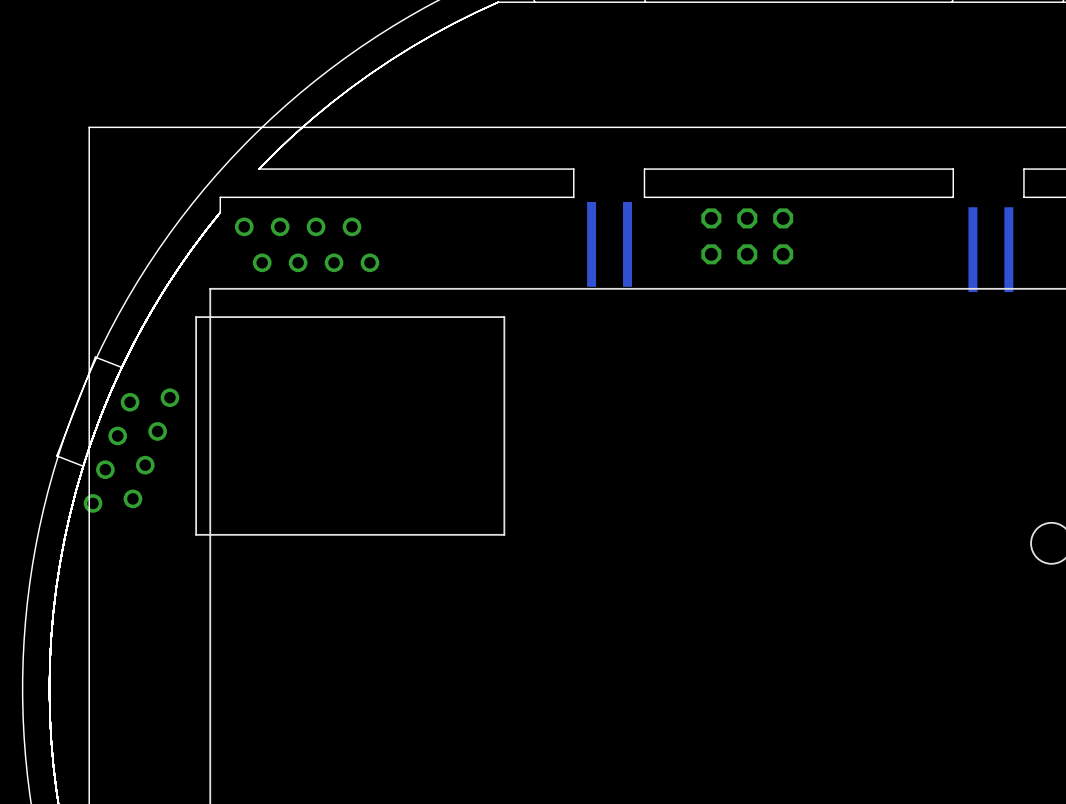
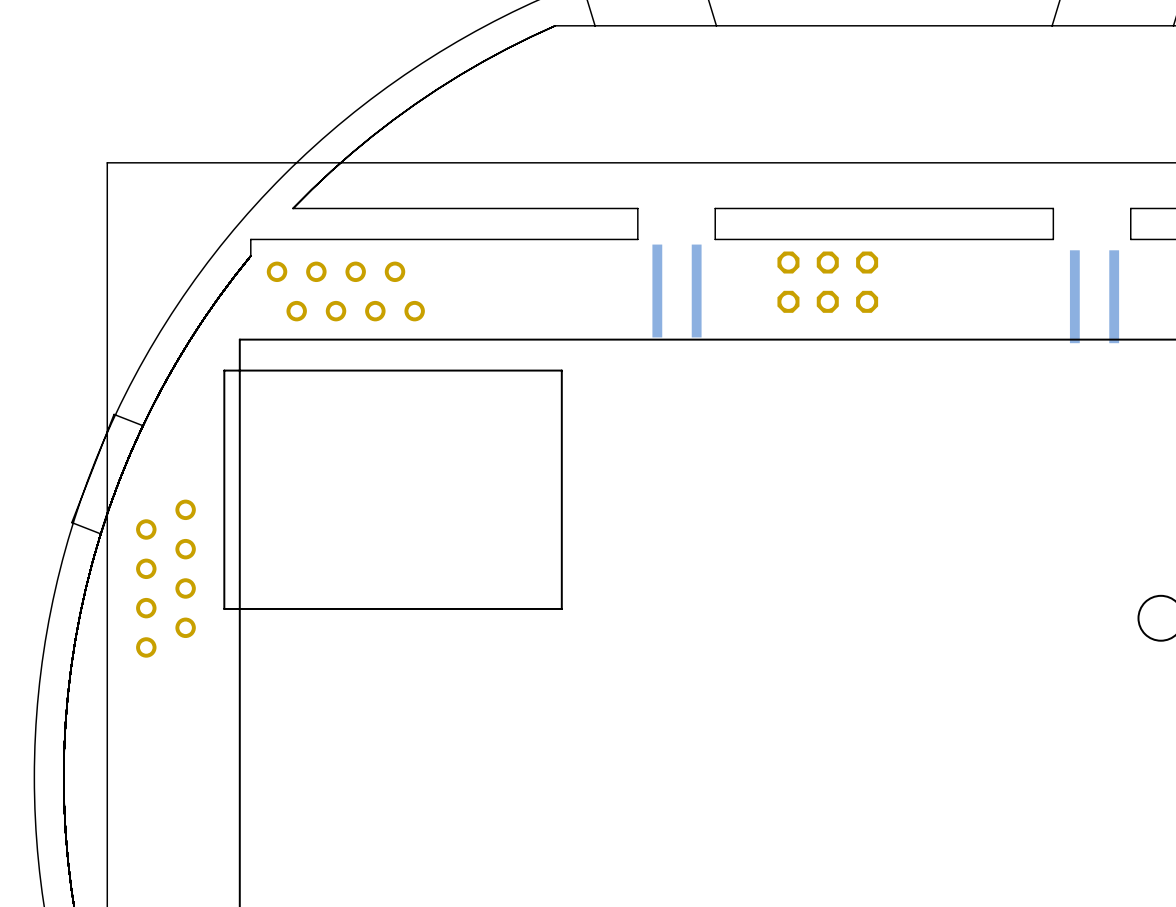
part: (131, 450) -> none
part: none -> (165, 578)

